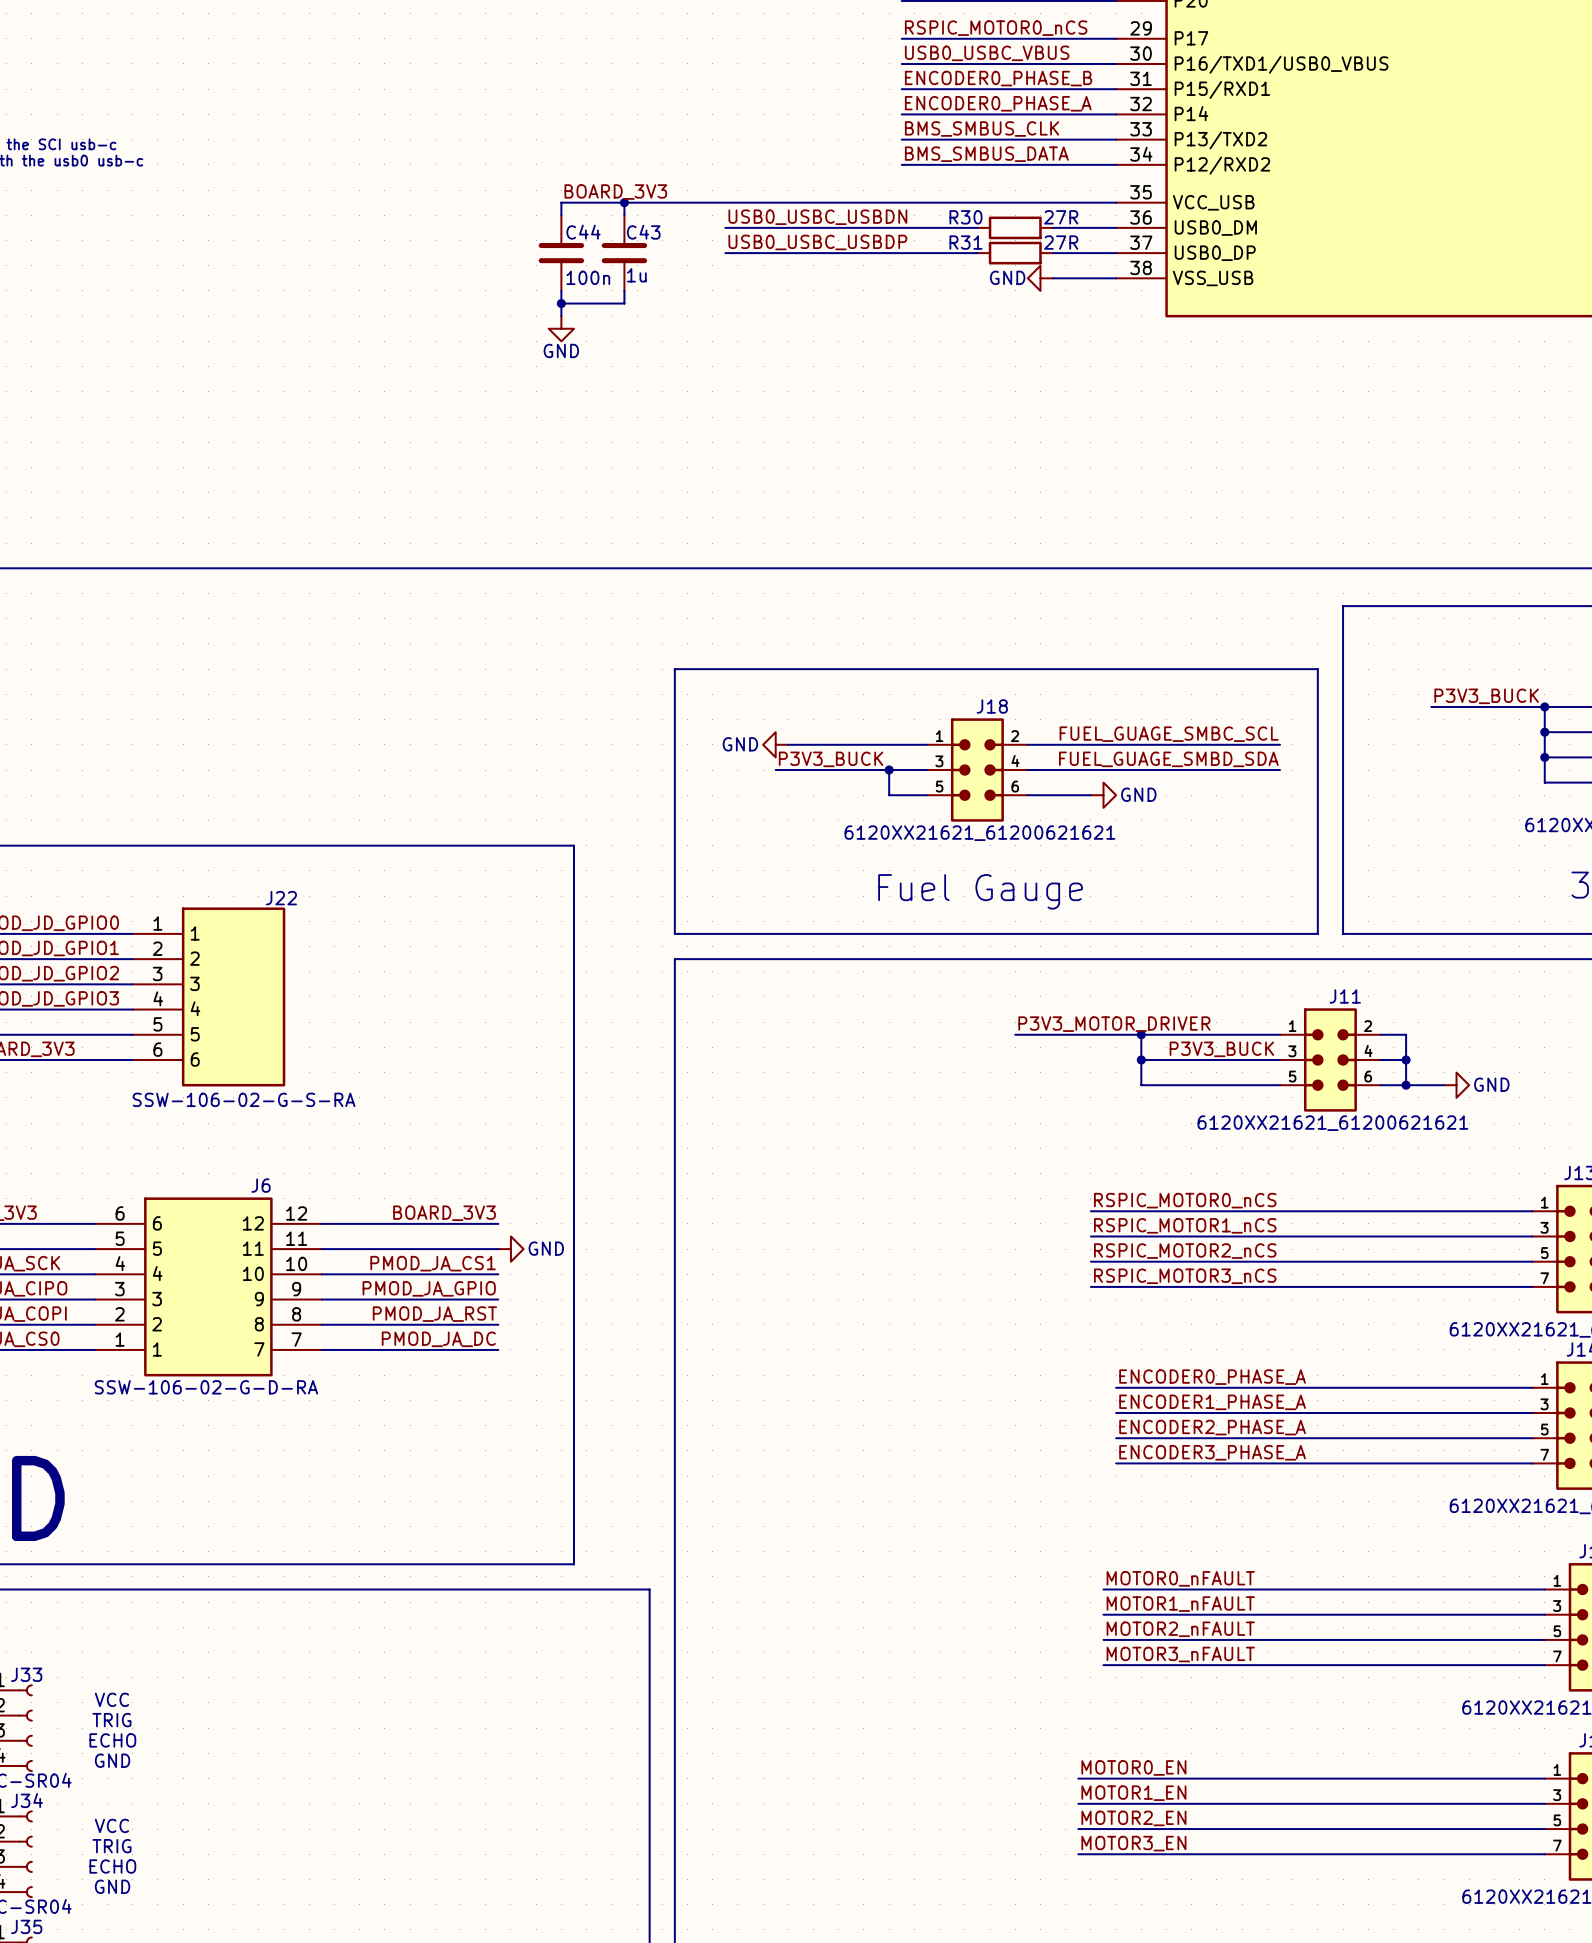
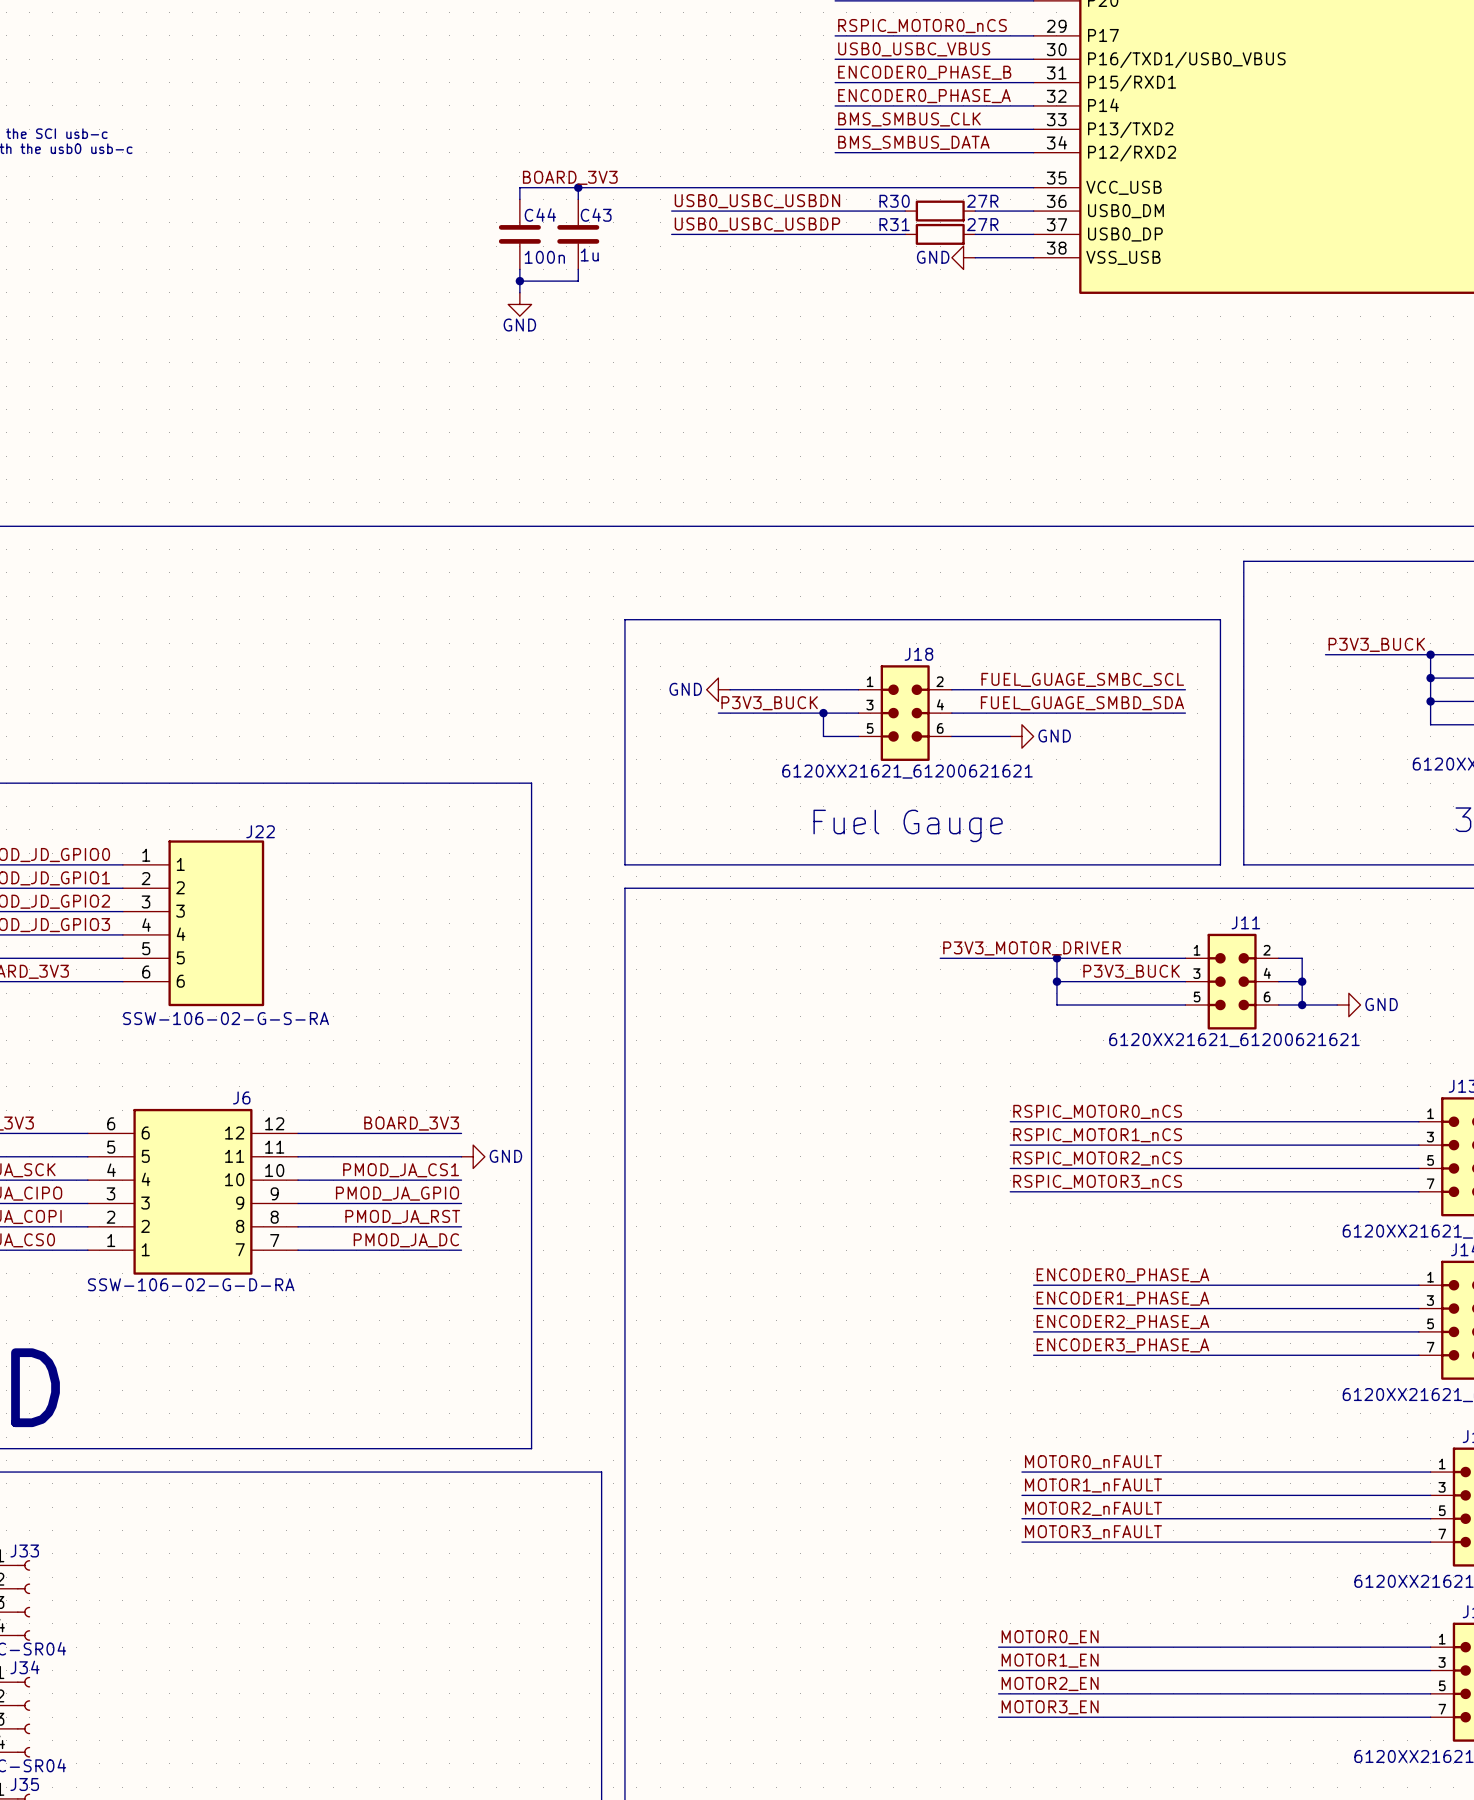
text: VCC (111, 1699) -> none
text: TRIG (111, 1720) -> none
text: ECHO (112, 1740) -> none
text: GND (112, 1760) -> none
text: VCC (111, 1825) -> none
text: TRIG (111, 1846) -> none
text: ECHO (112, 1866) -> none
text: GND (112, 1886) -> none

